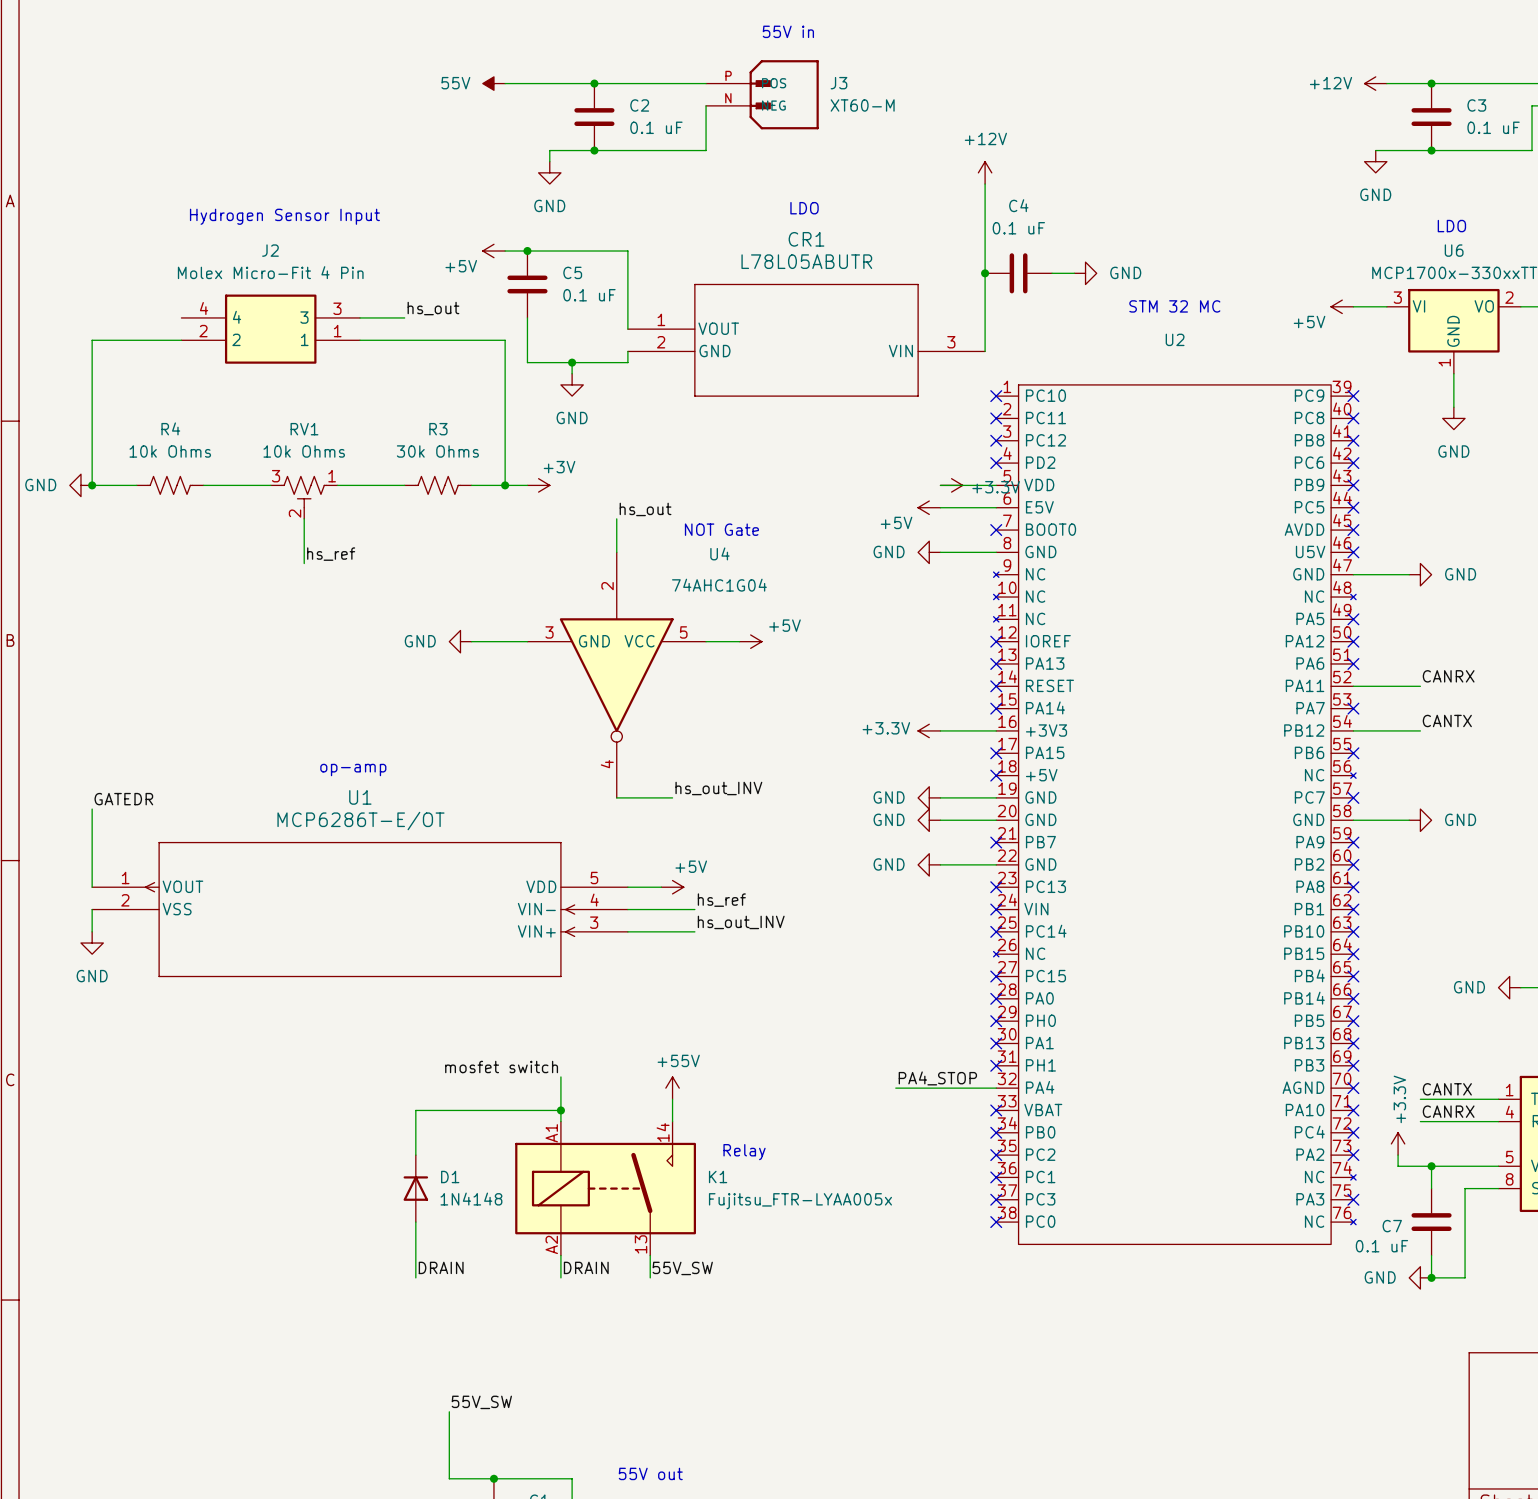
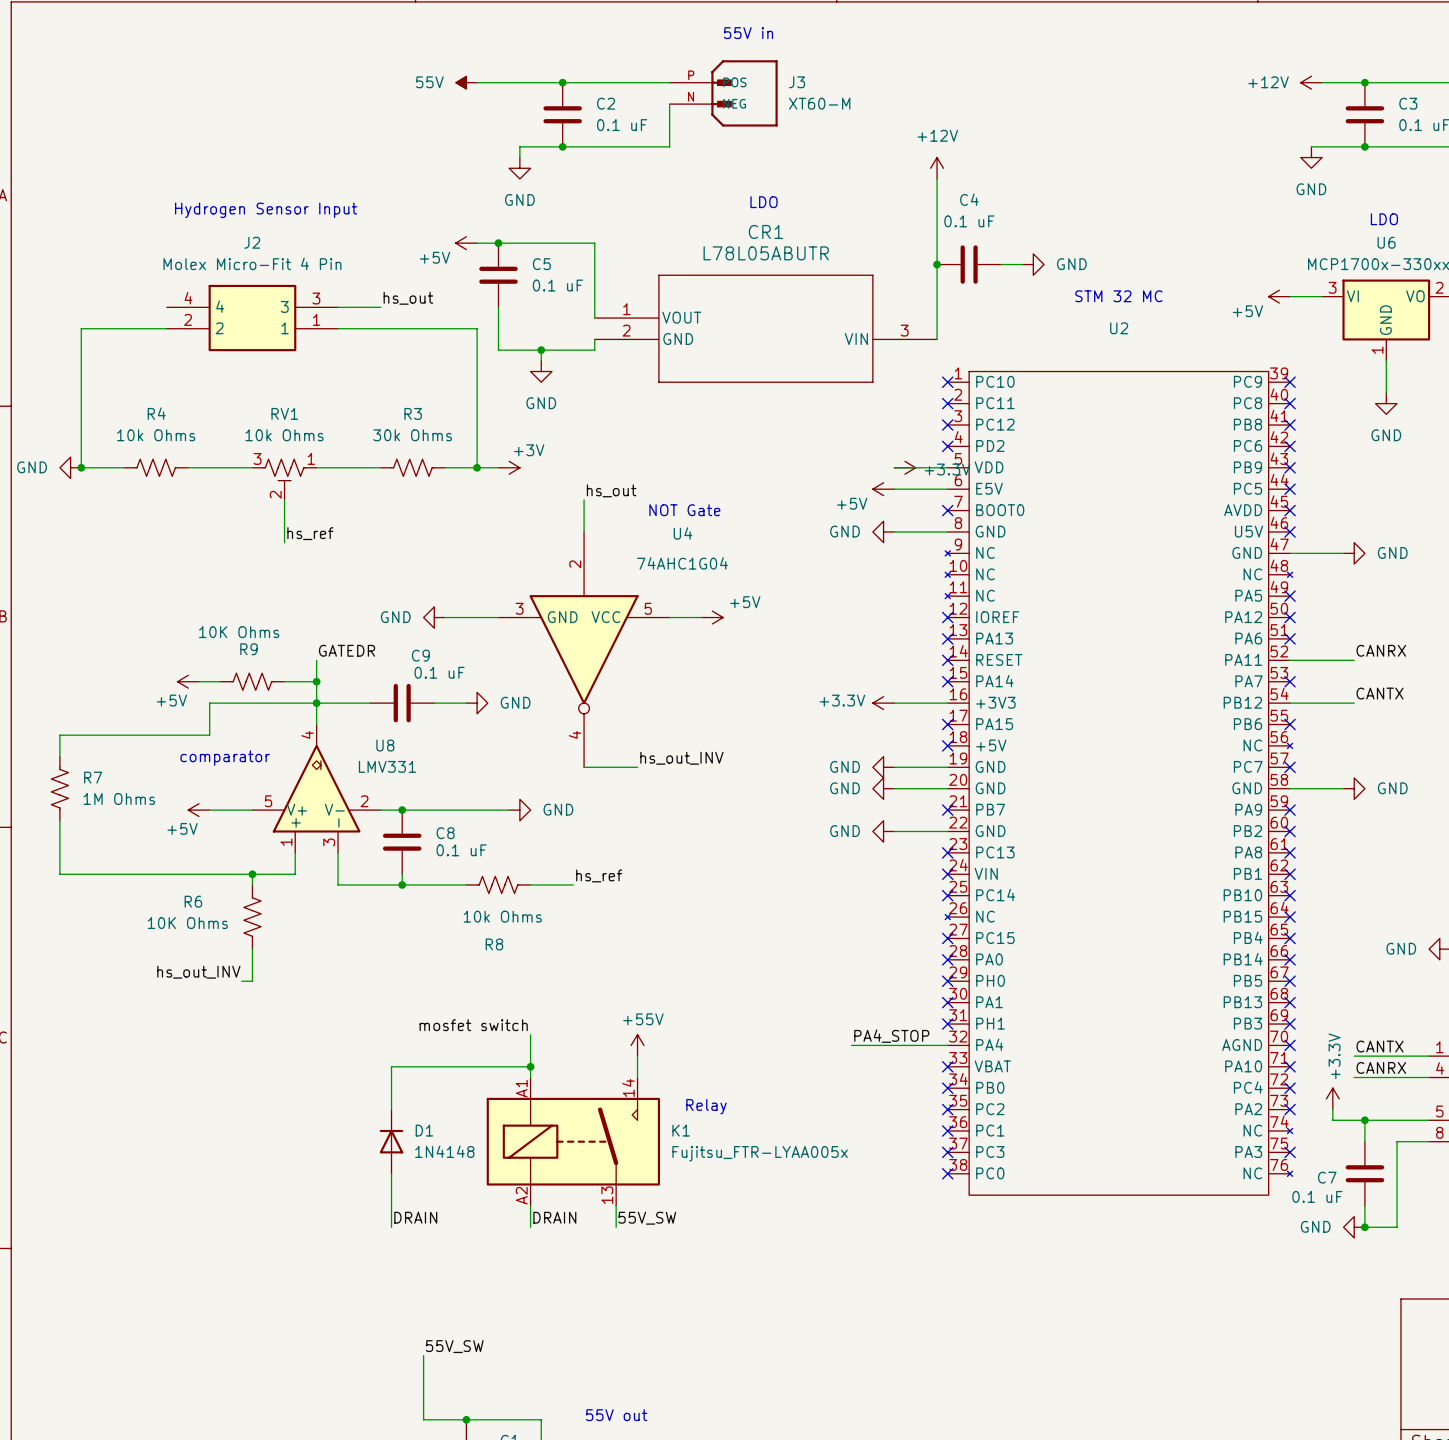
label: none -> GATEDR (347, 650)
wire: none -> (316, 660) (316, 724)
power symbol: none -> +5V (188, 681)
wire: none -> (198, 681) (220, 681)
R9: none -> 10K Ohms (252, 681)
wire: none -> (284, 681) (316, 681)
junction: none -> (316, 681)
junction: none -> (316, 703)
wire: none -> (370, 703) (209, 703) (209, 735) (59, 735) (59, 756)
C9: none -> 0.1 uF (402, 703)
wire: none -> (434, 703) (466, 703)
power symbol: none -> GND (477, 703)
text: op-amp (353, 770) -> none
text: none -> comparator (225, 758)
label: GATEDR (123, 799) -> none
wire: (92, 809) (92, 887) -> none
R7: none -> 1M Ohms (59, 788)
U8: none -> LMV331 (316, 788)
power symbol: none -> +5V (198, 810)
junction: none -> (402, 810)
power symbol: none -> GND (519, 810)
wire: none -> (59, 820) (59, 874) (295, 874) (295, 852)
C8: none -> 0.1 uF (402, 842)
wire: none -> (338, 852) (338, 884) (466, 884)
wire: (627, 887) (661, 887) -> none
power symbol: +5V (672, 887) -> none
label position: hs_ref (721, 900) -> hs_ref (599, 875)
wire: (92, 909) (92, 931) -> none
wire: none -> (252, 874) (252, 884)
junction: none -> (252, 874)
U1: MCP6286T-E/OT (360, 909) -> none
wire: none -> (402, 874) (402, 884)
wire: (627, 909) (694, 909) -> none
junction: none -> (402, 884)
R8: none -> 10k Ohms (498, 884)
wire: none -> (530, 884) (573, 884)
label: hs_out_INV (741, 922) -> none
wire: (627, 931) (694, 931) -> none
power symbol: GND (92, 943) -> none
R6: none -> 10K Ohms (252, 917)
wire: none -> (252, 949) (252, 981) (241, 981)
label: none -> hs_out_INV (198, 972)

